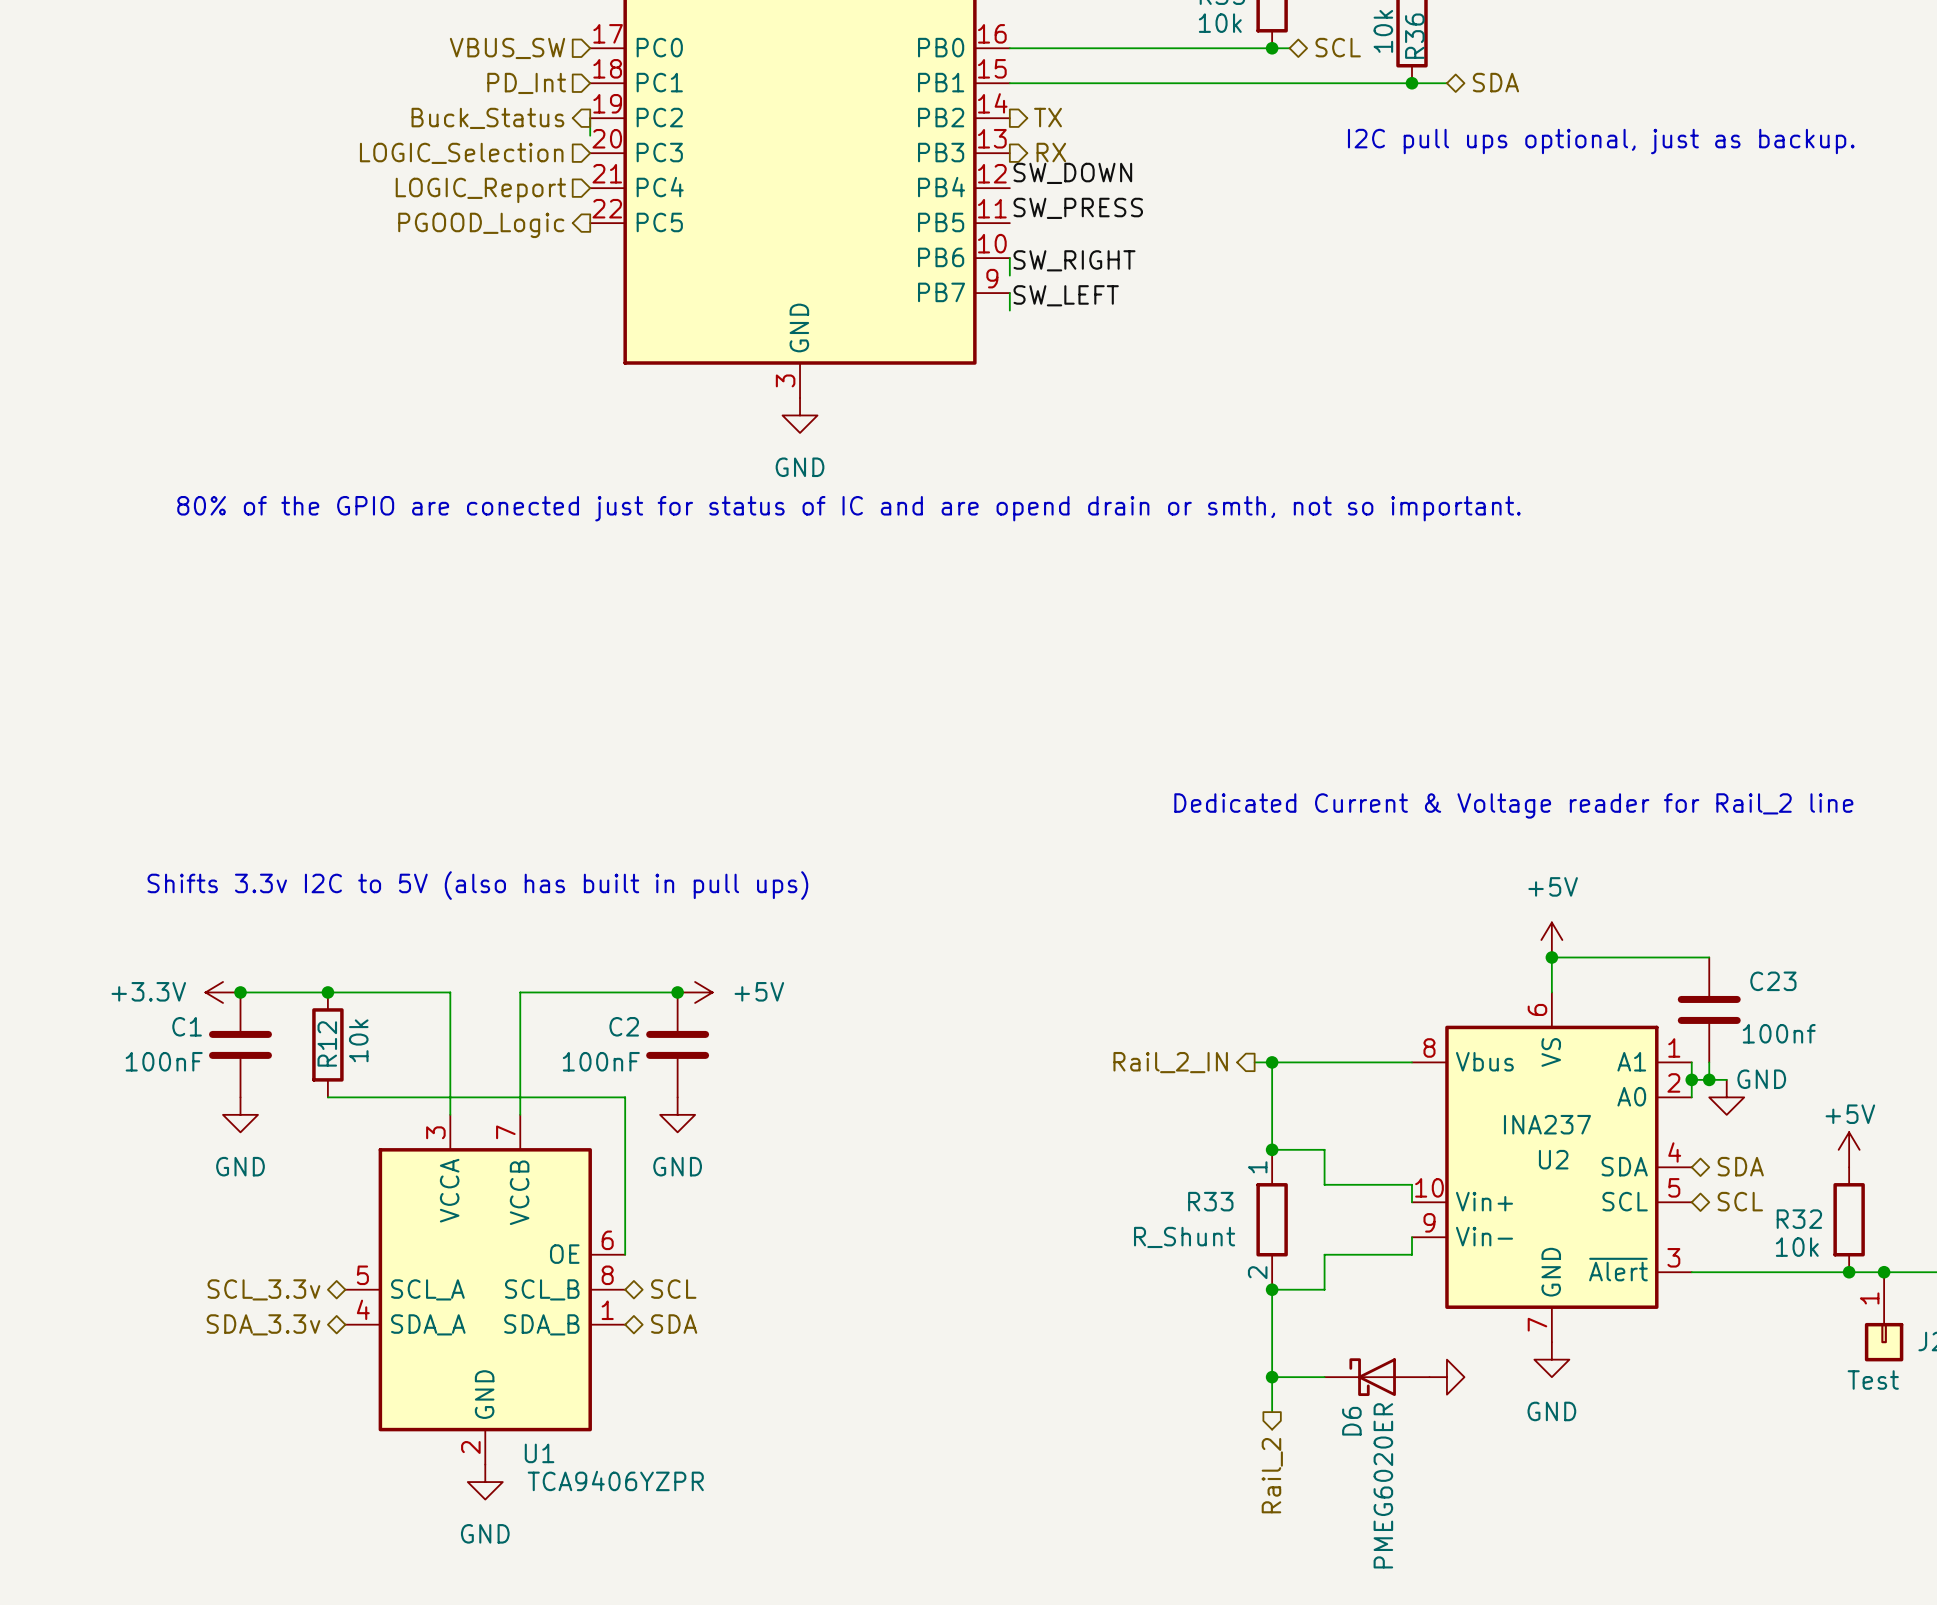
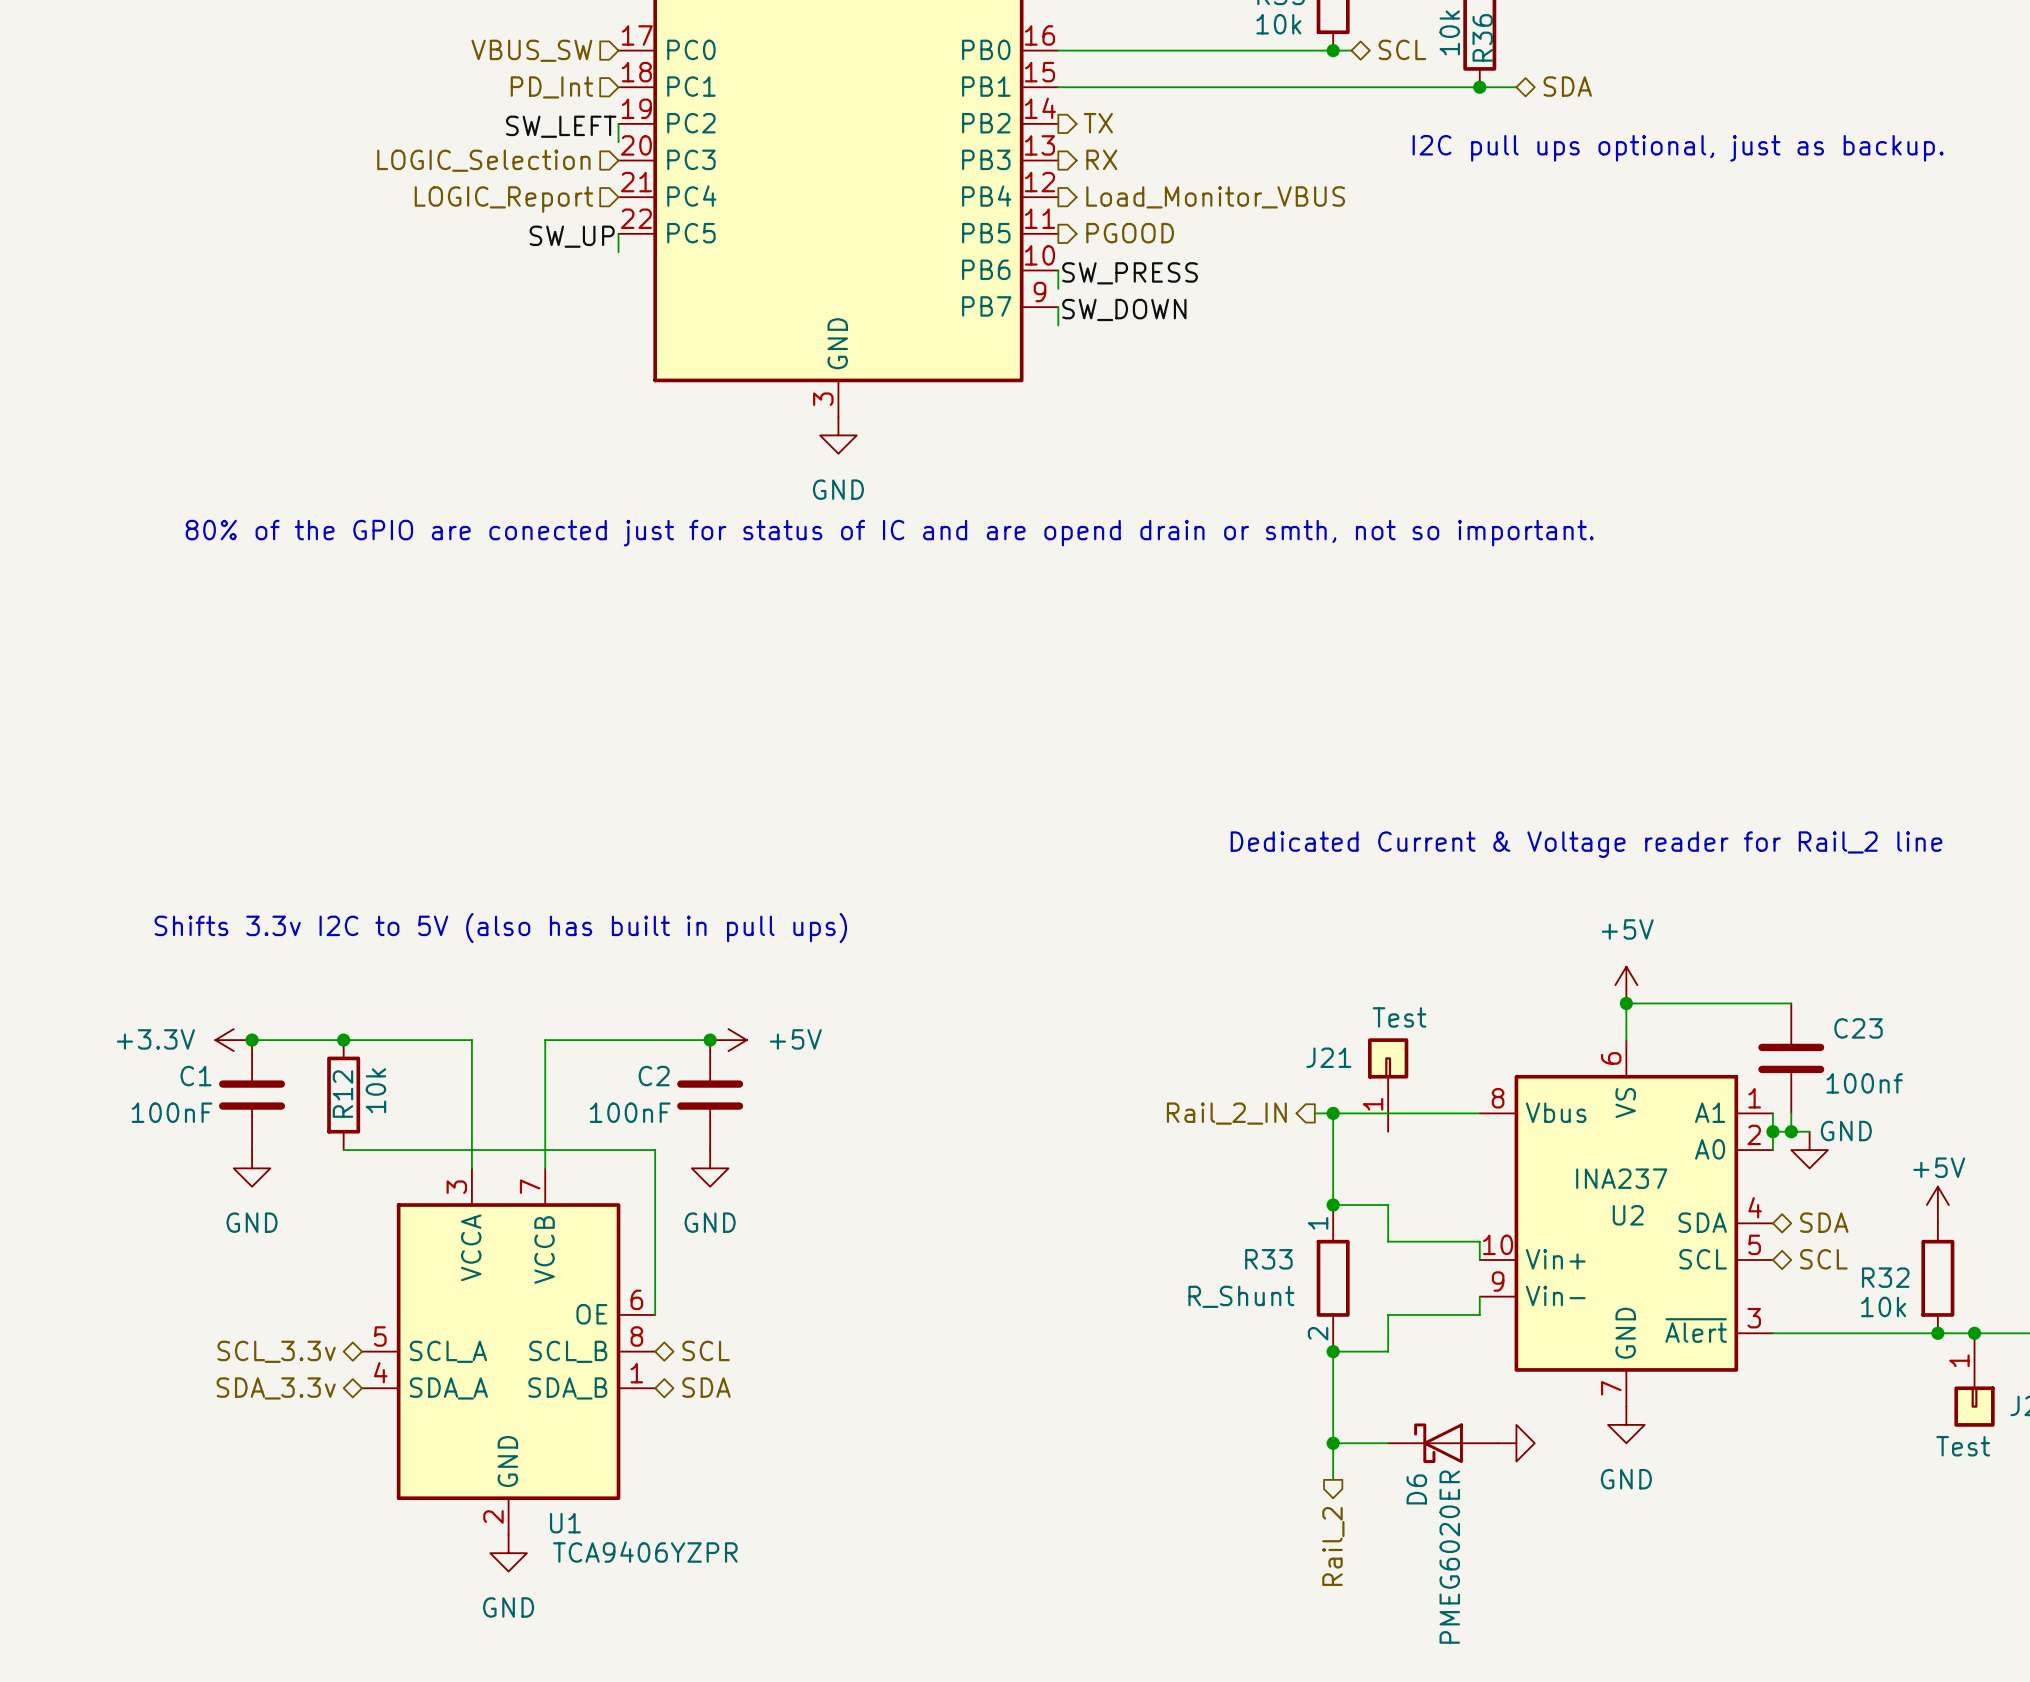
hierarchical label: Buck_Status (487, 118) -> none
label: none -> SW_LEFT (561, 126)
label: SW_DOWN (1072, 173) -> none
hierarchical label: none -> Load_Monitor_VBUS (1215, 197)
label: SW_PRESS (1078, 208) -> none
hierarchical label: none -> PGOOD (1130, 233)
wire: none -> (618, 233) (618, 252)
hierarchical label: PGOOD_Logic (481, 225) -> none
label: none -> SW_UP (572, 236)
label: SW_RIGHT (1074, 260) -> SW_PRESS (1130, 273)
label: SW_LEFT (1066, 295) -> SW_DOWN (1124, 309)
J21: none -> Test (1388, 1084)

